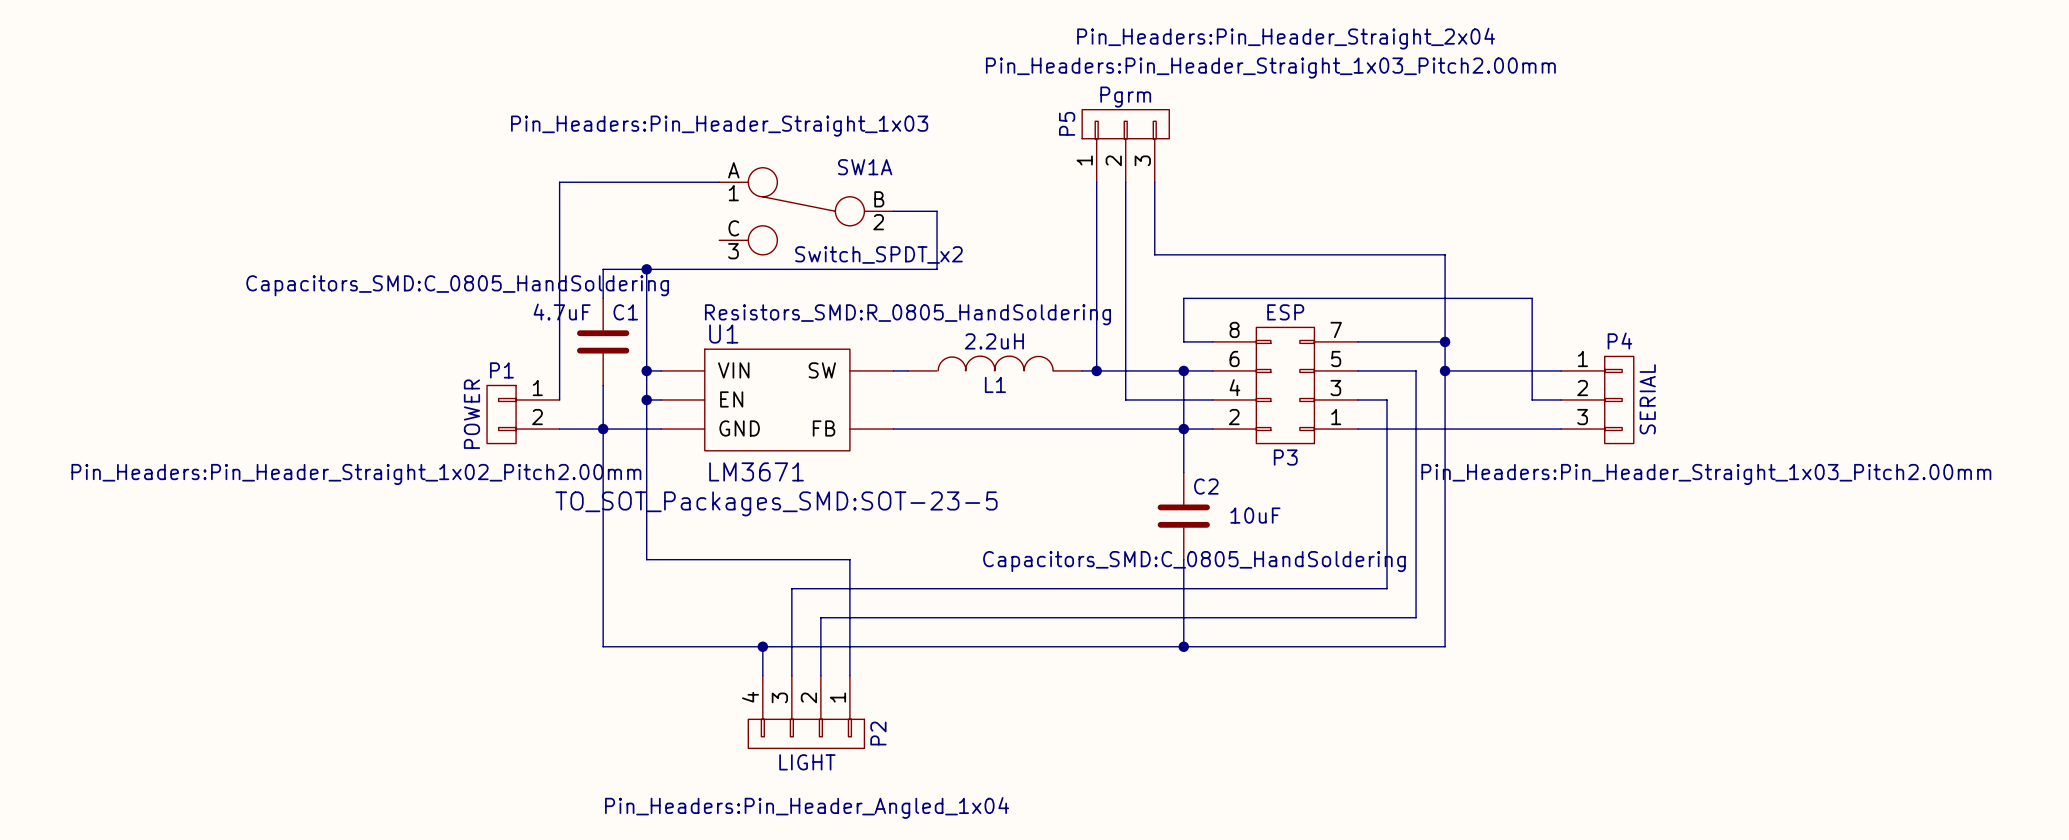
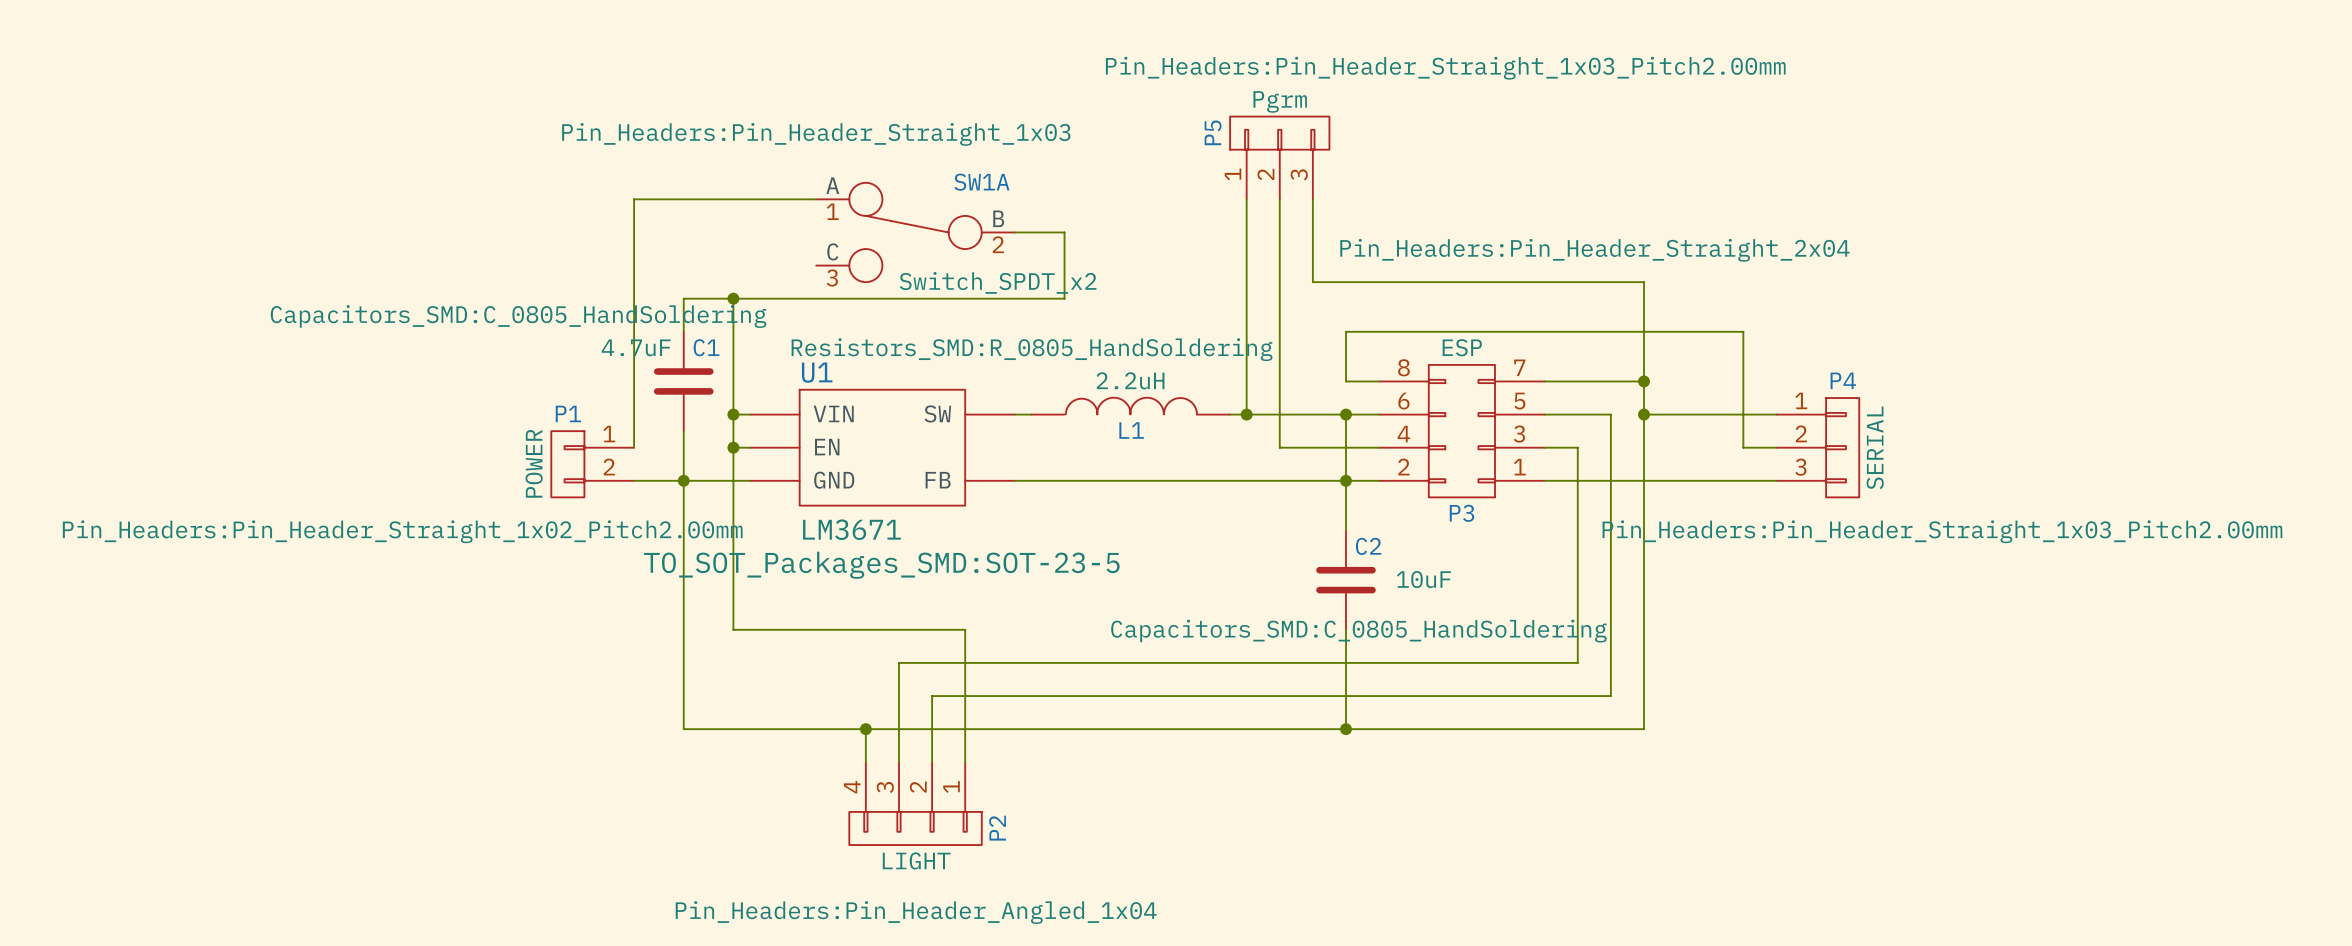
P3 text position: Pin_Headers:Pin_Header_Straight_2x04 (1286, 38) -> Pin_Headers:Pin_Header_Straight_2x04 (1594, 250)

